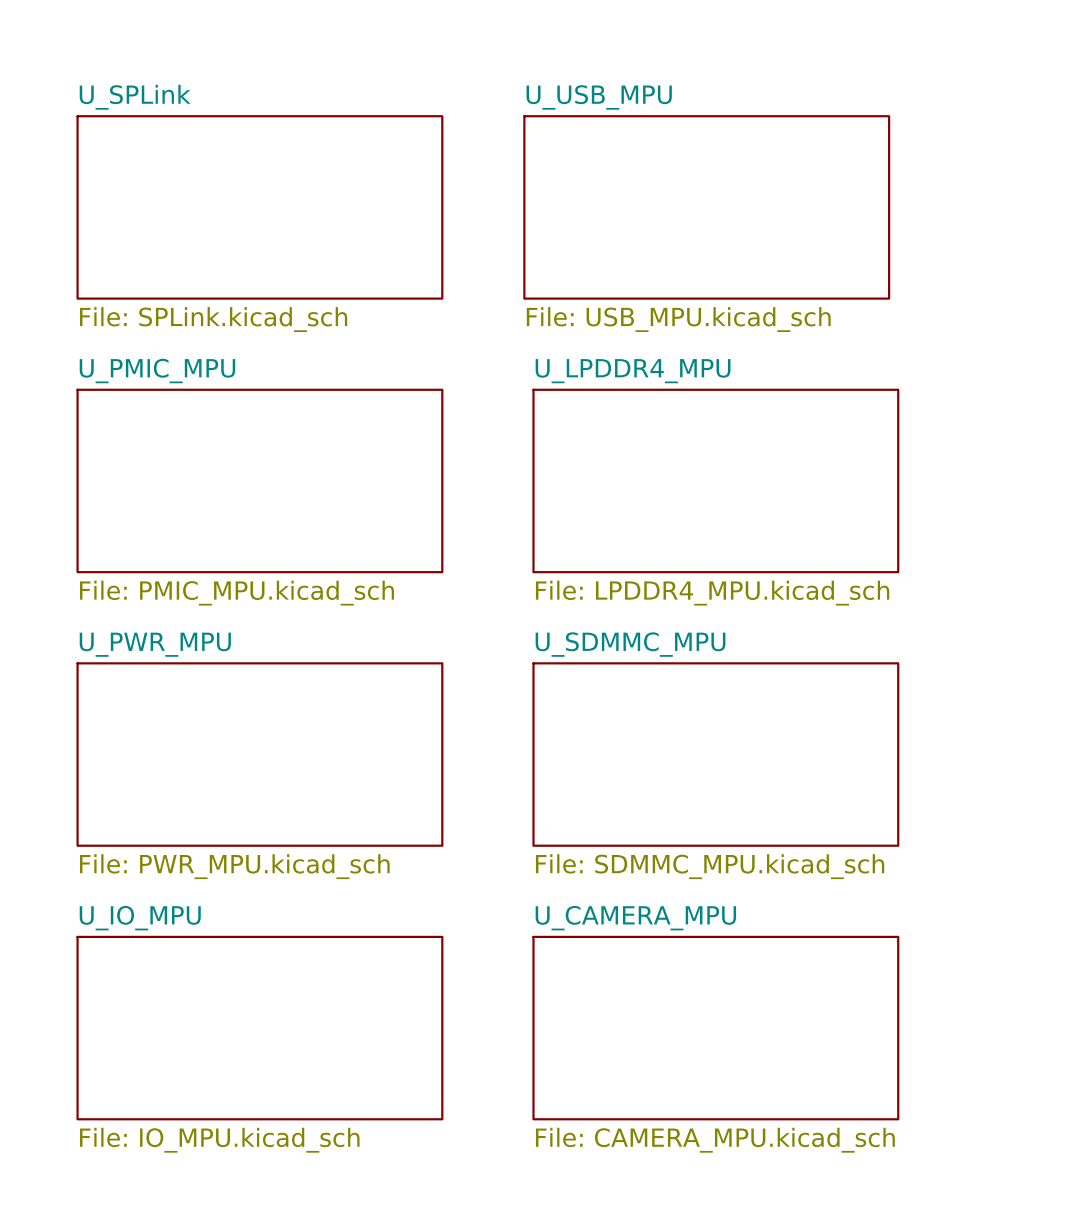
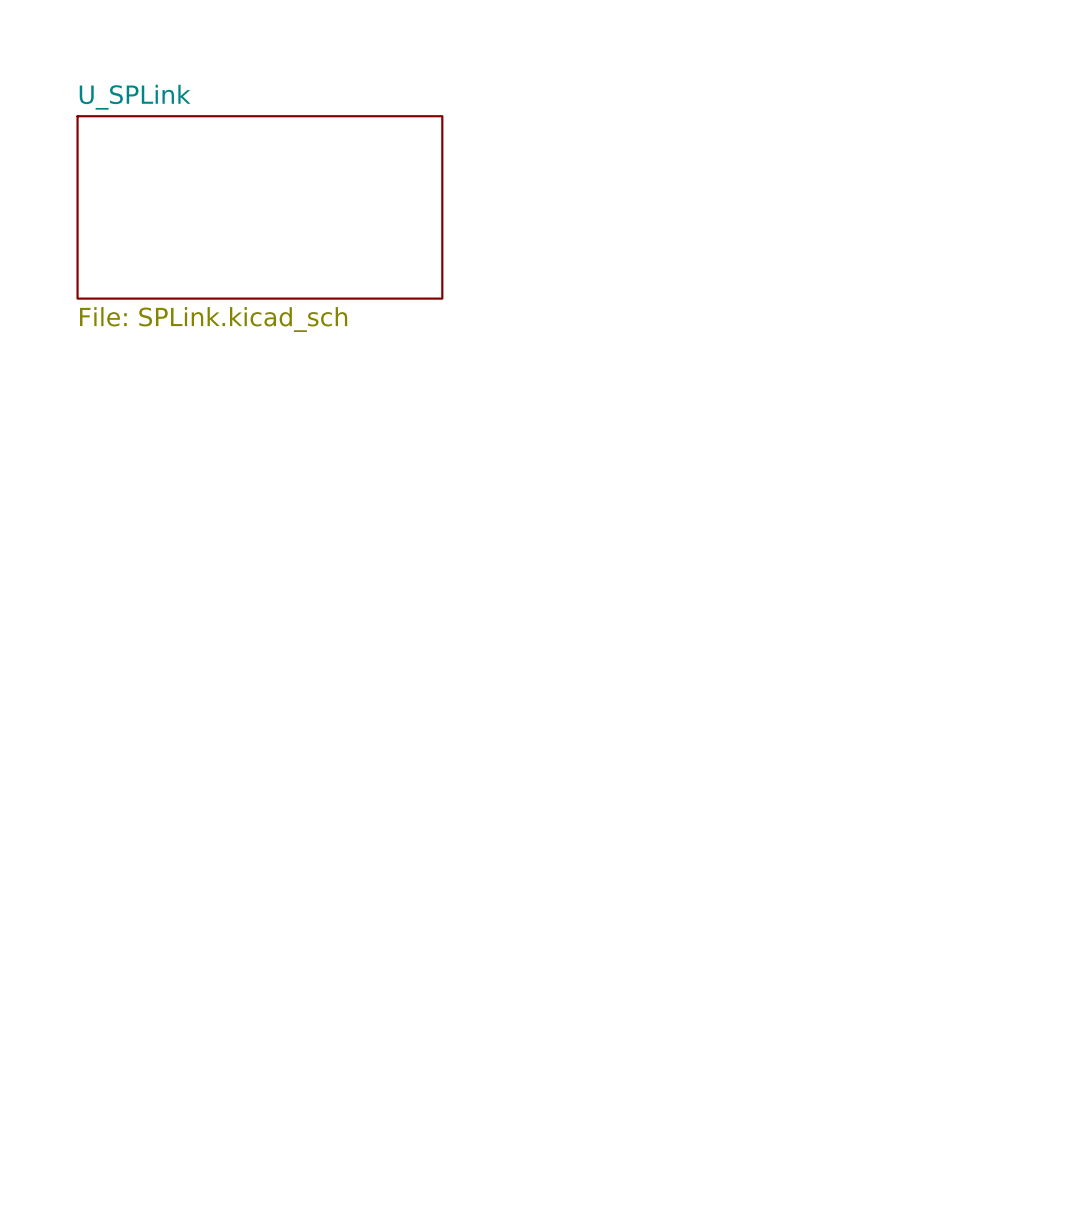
sheet U_USB_MPU: File: USB_MPU.kicad_sch (706, 207) -> none
sheet U_PMIC_MPU: File: PMIC_MPU.kicad_sch (259, 480) -> none
sheet U_LPDDR4_MPU: File: LPDDR4_MPU.kicad_sch (715, 480) -> none
sheet U_PWR_MPU: File: PWR_MPU.kicad_sch (259, 754) -> none
sheet U_SDMMC_MPU: File: SDMMC_MPU.kicad_sch (715, 754) -> none
sheet U_IO_MPU: File: IO_MPU.kicad_sch (259, 1028) -> none
sheet U_CAMERA_MPU: File: CAMERA_MPU.kicad_sch (715, 1028) -> none

